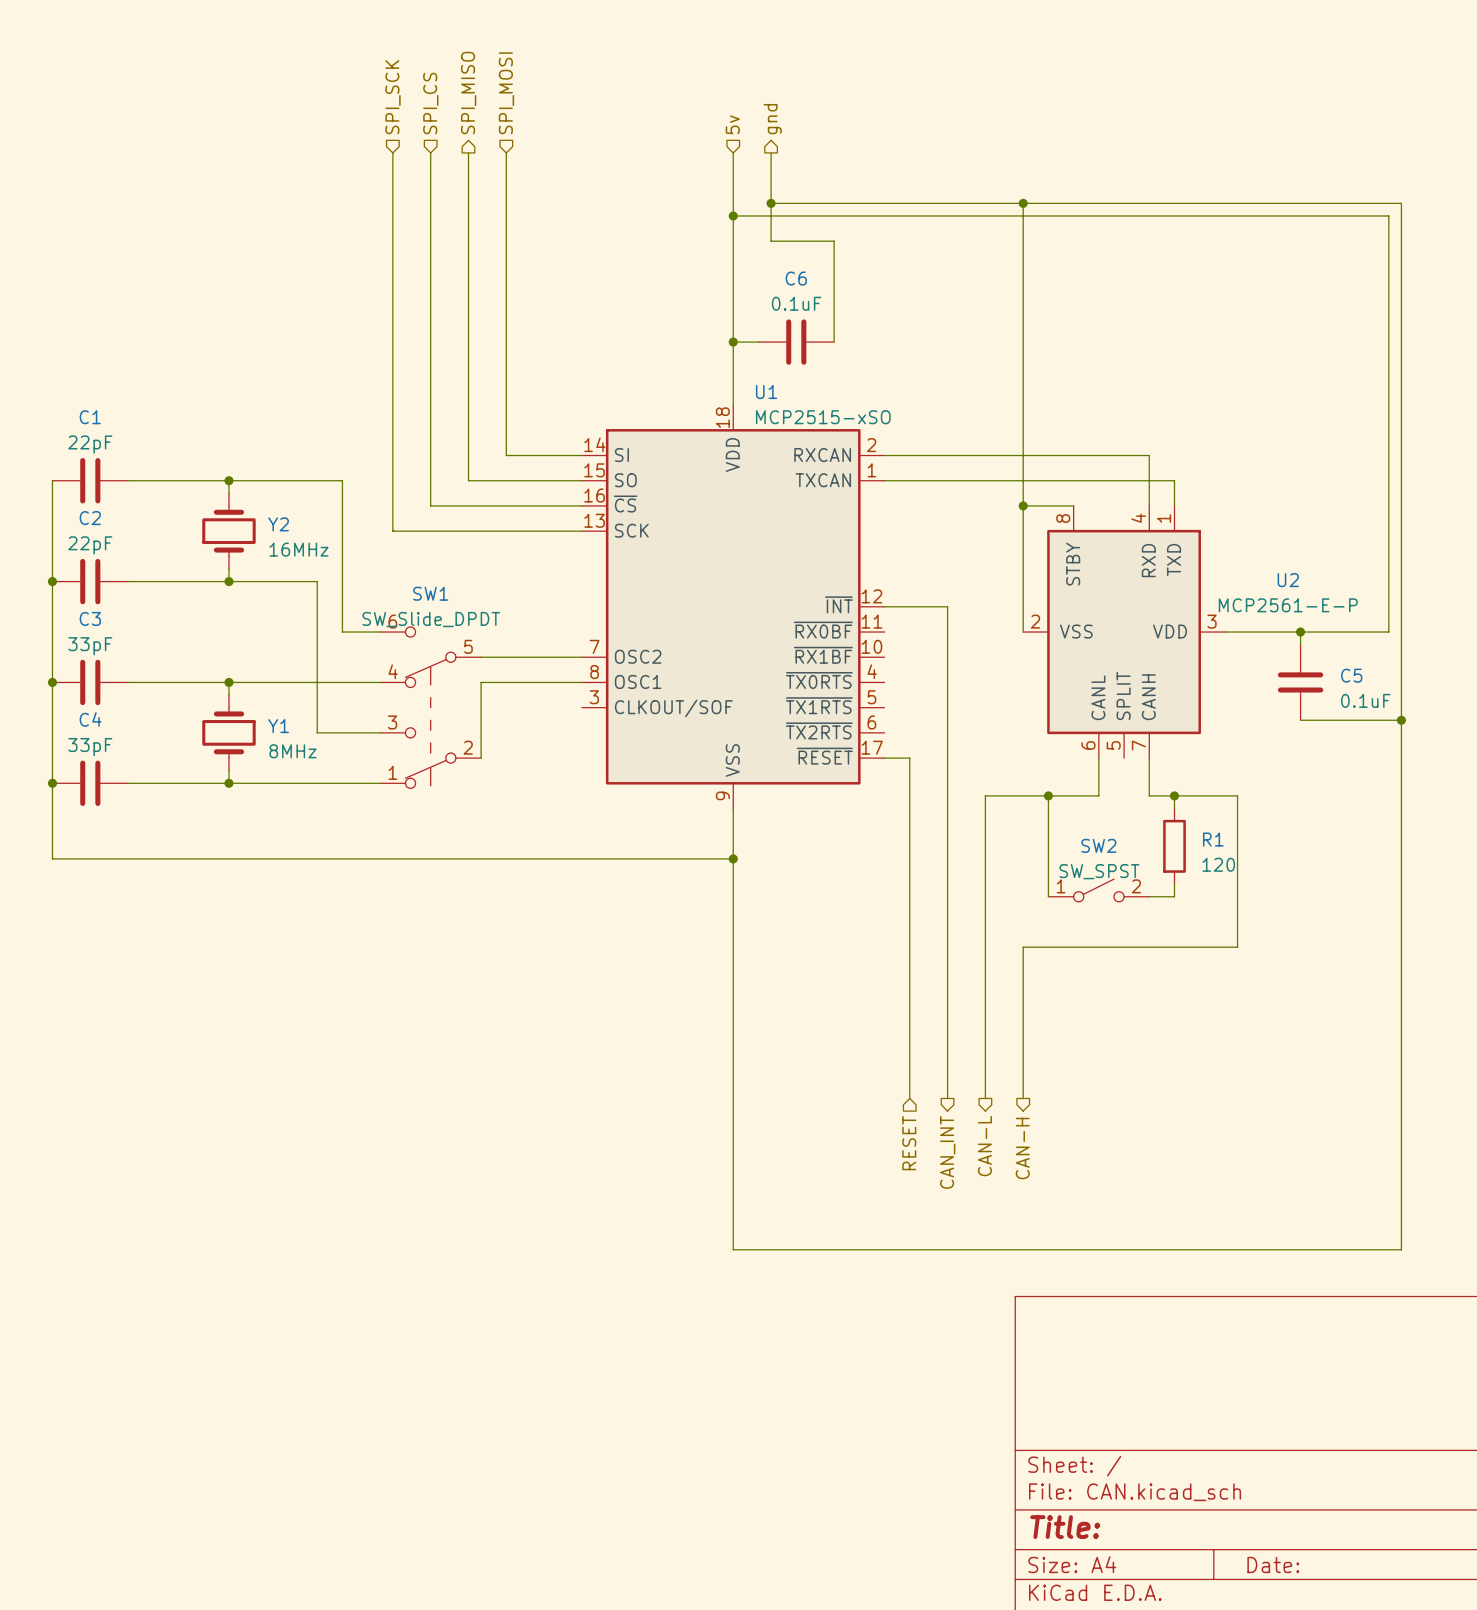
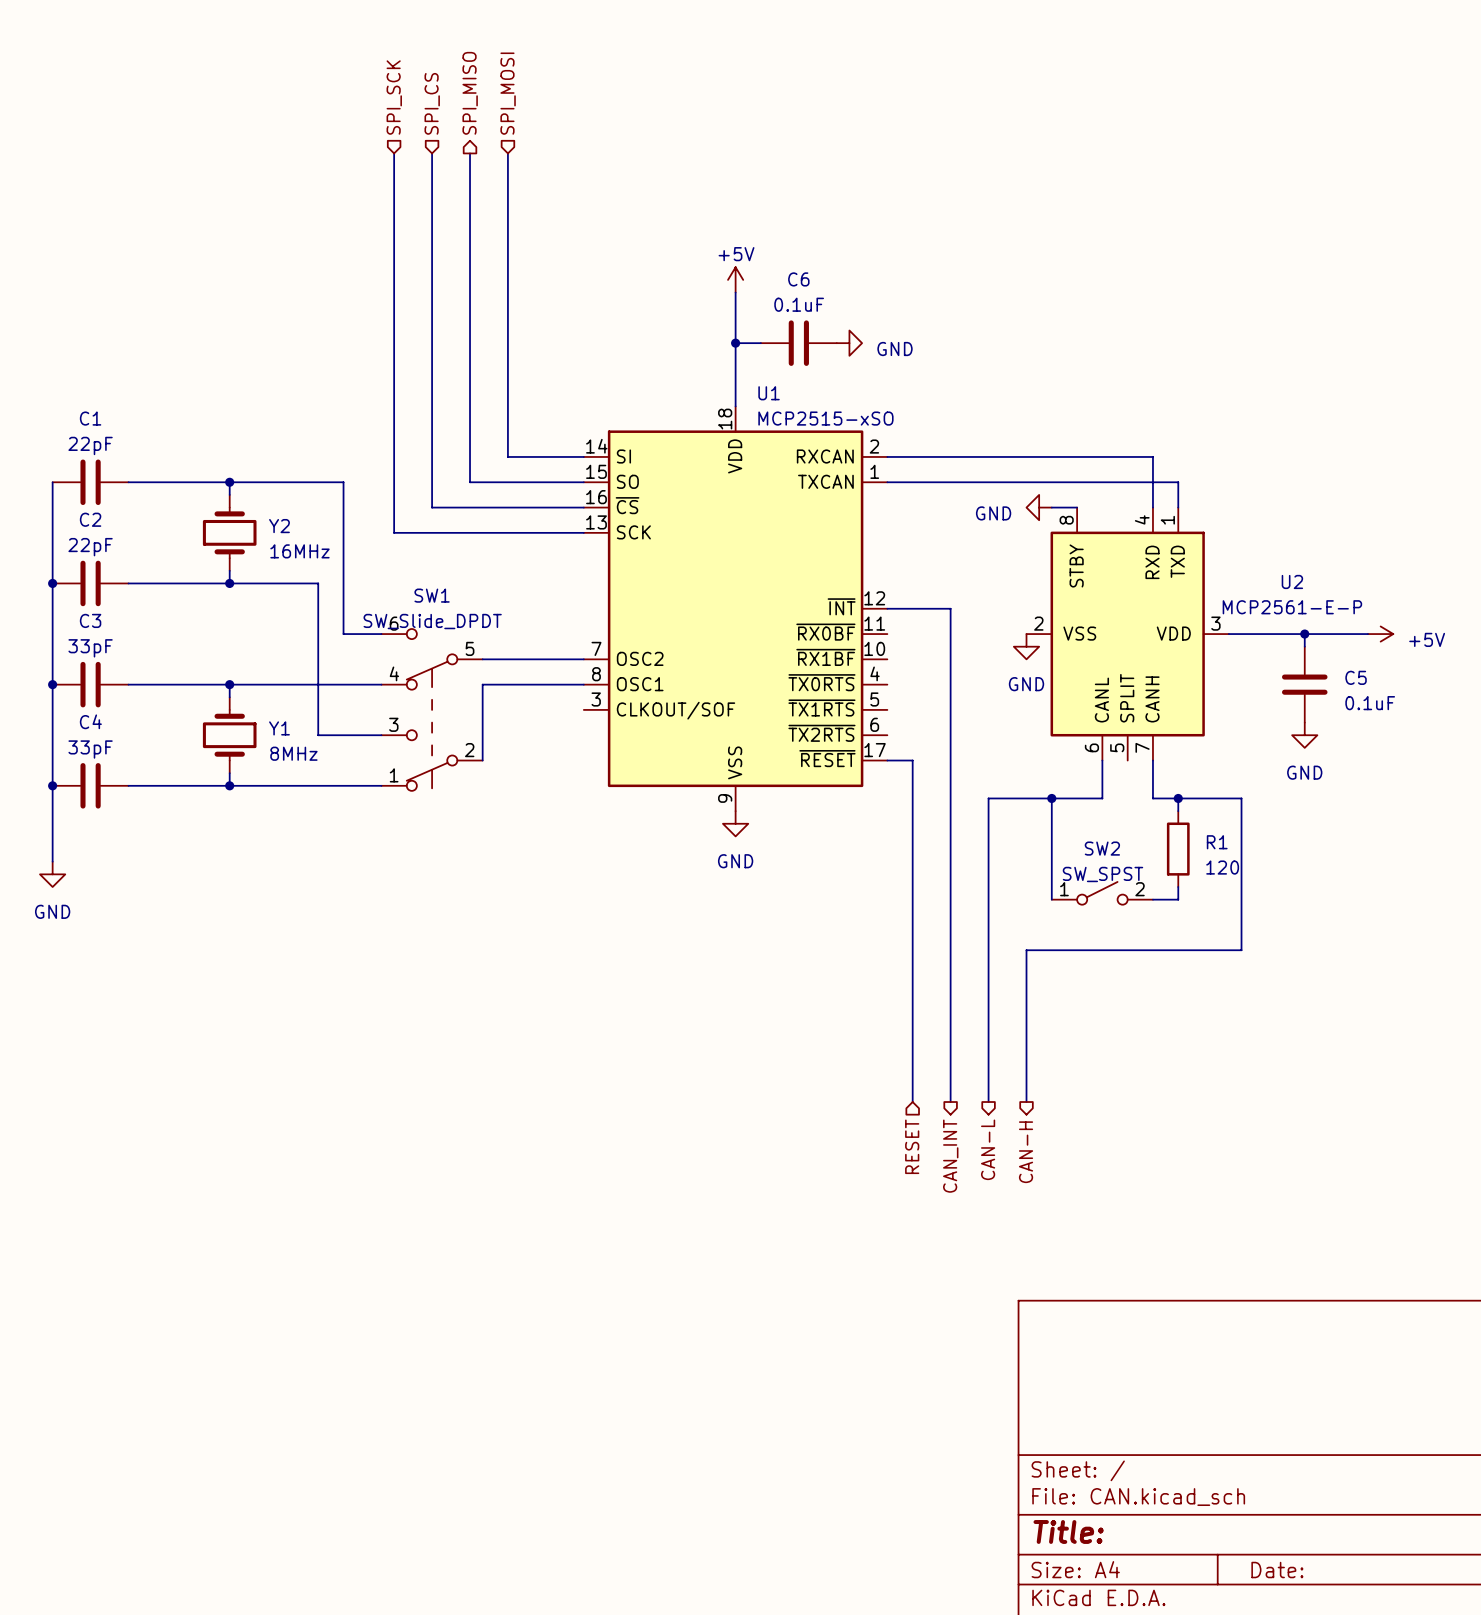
hierarchical label: gnd (772, 119) -> none
hierarchical label: 5v (732, 124) -> none
wire: (733, 152) (733, 291) -> none
wire: (771, 152) (771, 241) (834, 241) (834, 342) -> none
wire: (771, 203) (1401, 203) (1401, 1249) (733, 1249) (733, 808) -> none
junction: (771, 203) -> none
wire: (1023, 203) (1023, 632) -> none
junction: (1023, 203) -> none
wire: (733, 215) (1388, 215) (1388, 632) (1363, 632) -> none
junction: (733, 215) -> none
power symbol: none -> +5V (735, 279)
power symbol: none -> GND (849, 343)
junction: (1023, 505) -> none
power symbol: none -> GND (1039, 507)
power symbol: none -> +5V (1380, 634)
power symbol: none -> GND (1026, 646)
wire: (1300, 720) (1401, 720) -> none
junction: (1401, 720) -> none
power symbol: none -> GND (1304, 735)
power symbol: none -> GND (735, 823)
wire: (52, 858) (733, 858) -> none
junction: (733, 858) -> none
power symbol: none -> GND (52, 874)

